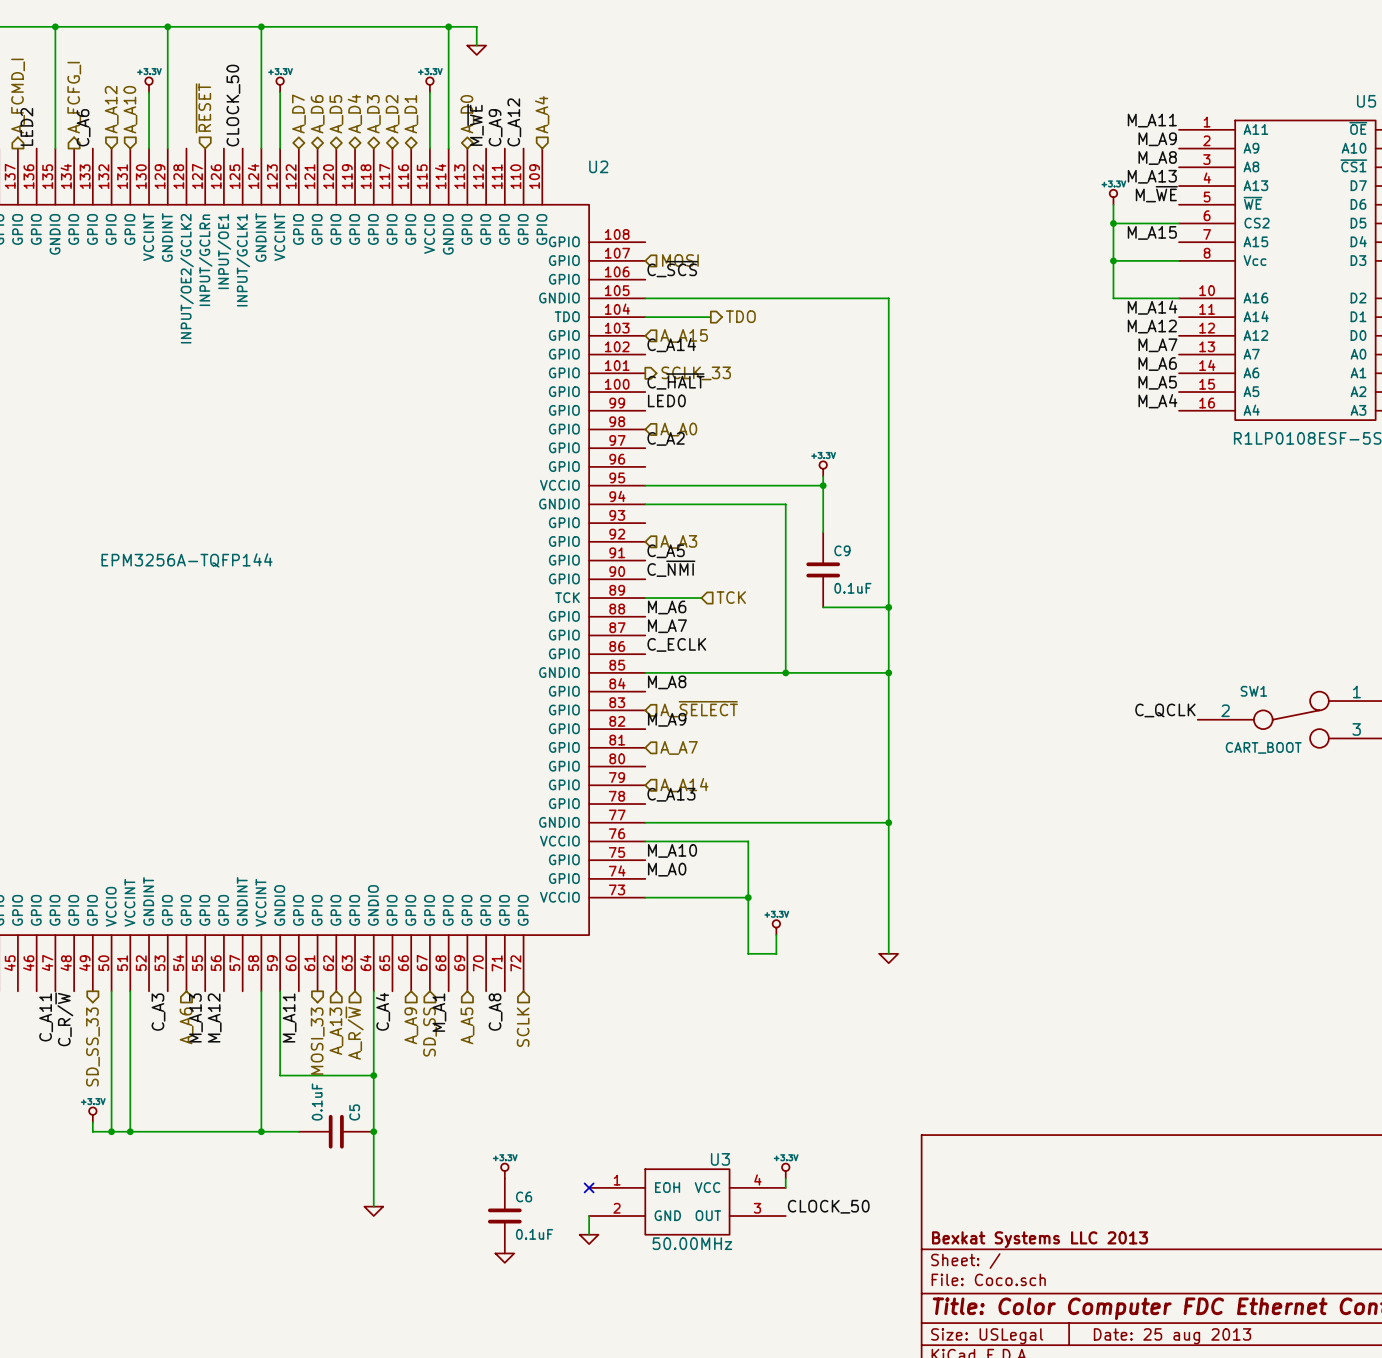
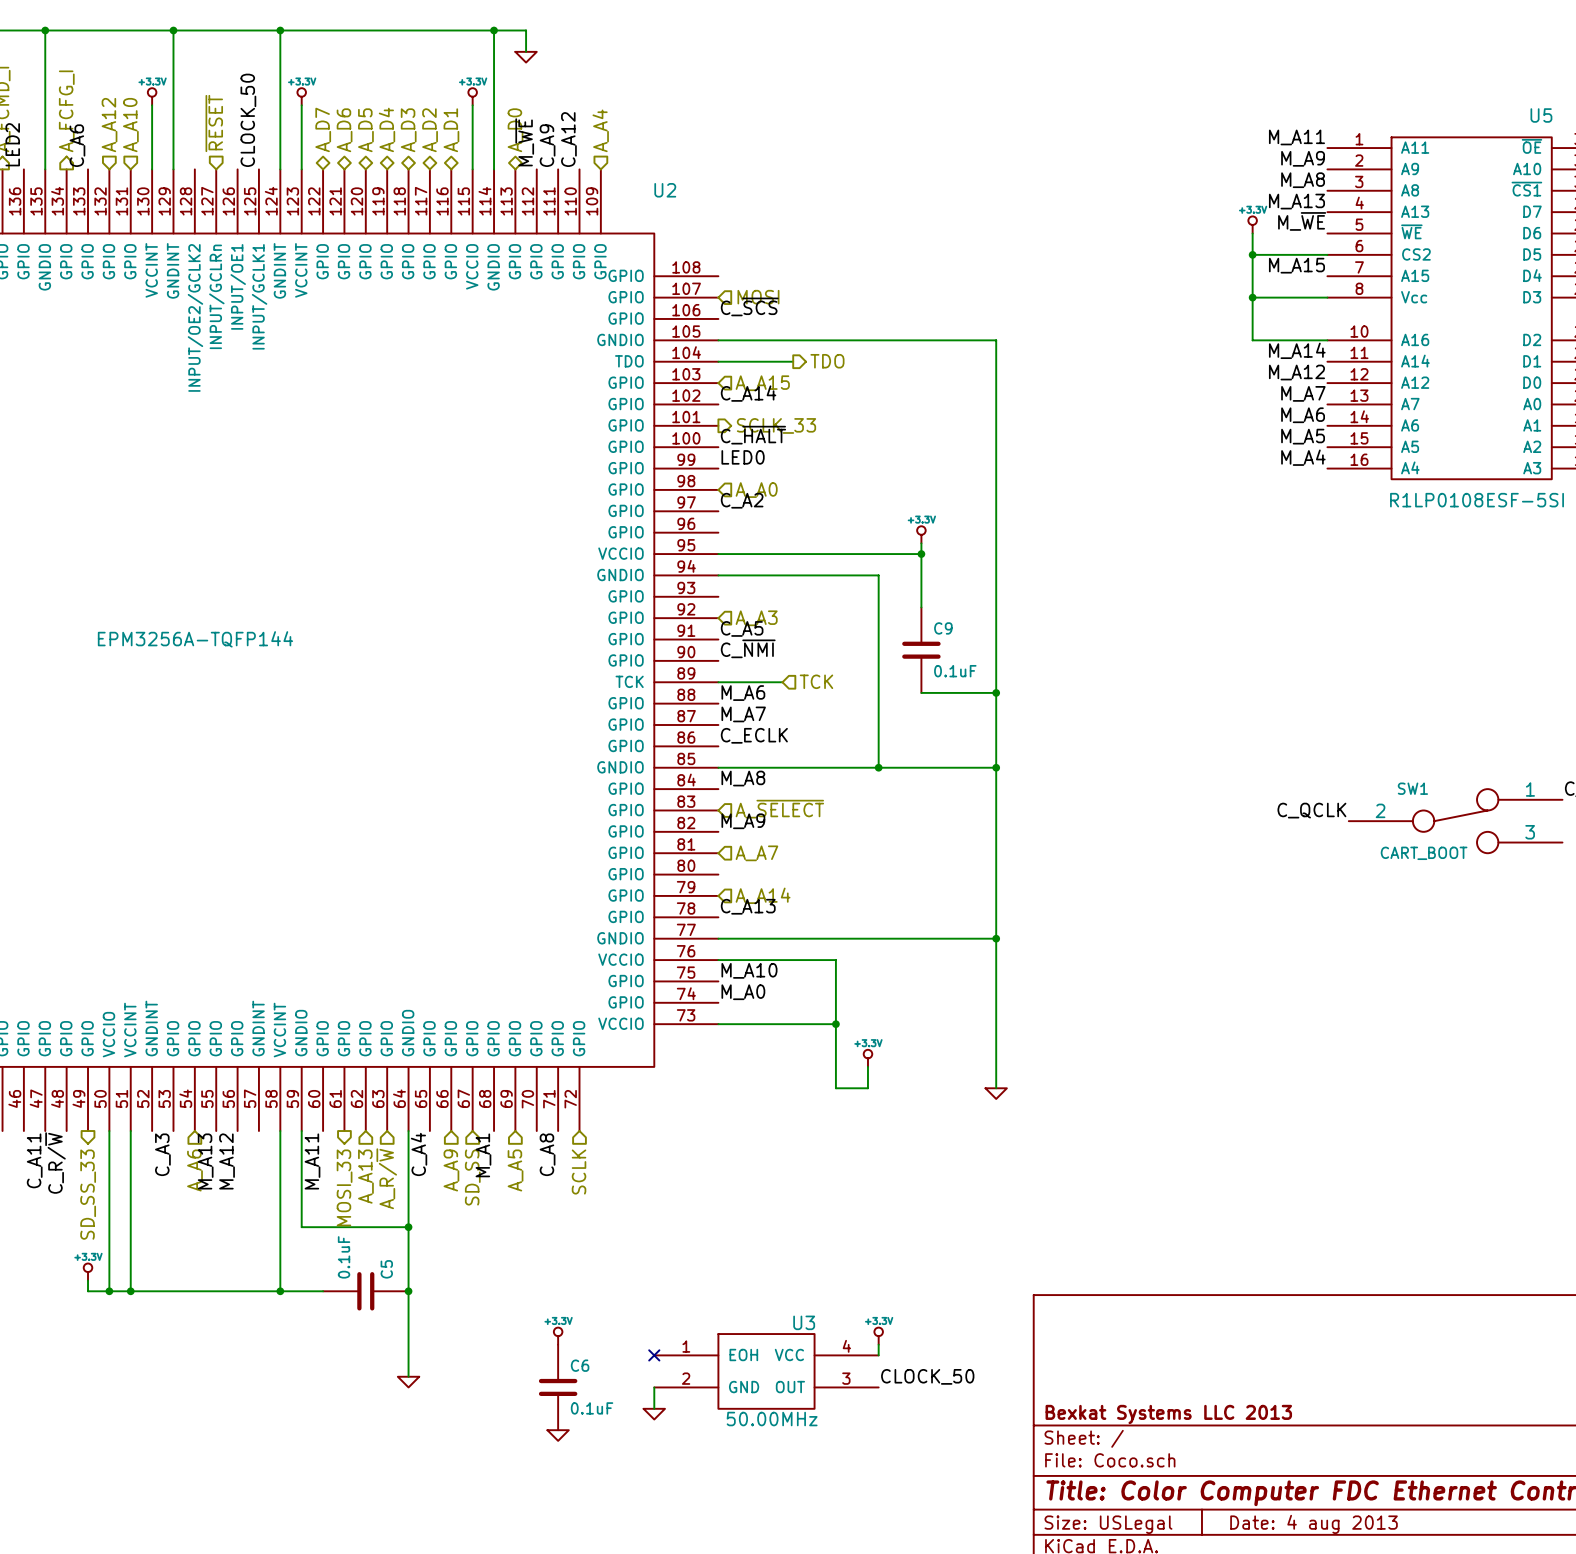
title block: Date: 25 aug 2013 (1172, 1336) -> Date: 4 aug 2013 (1314, 1524)

